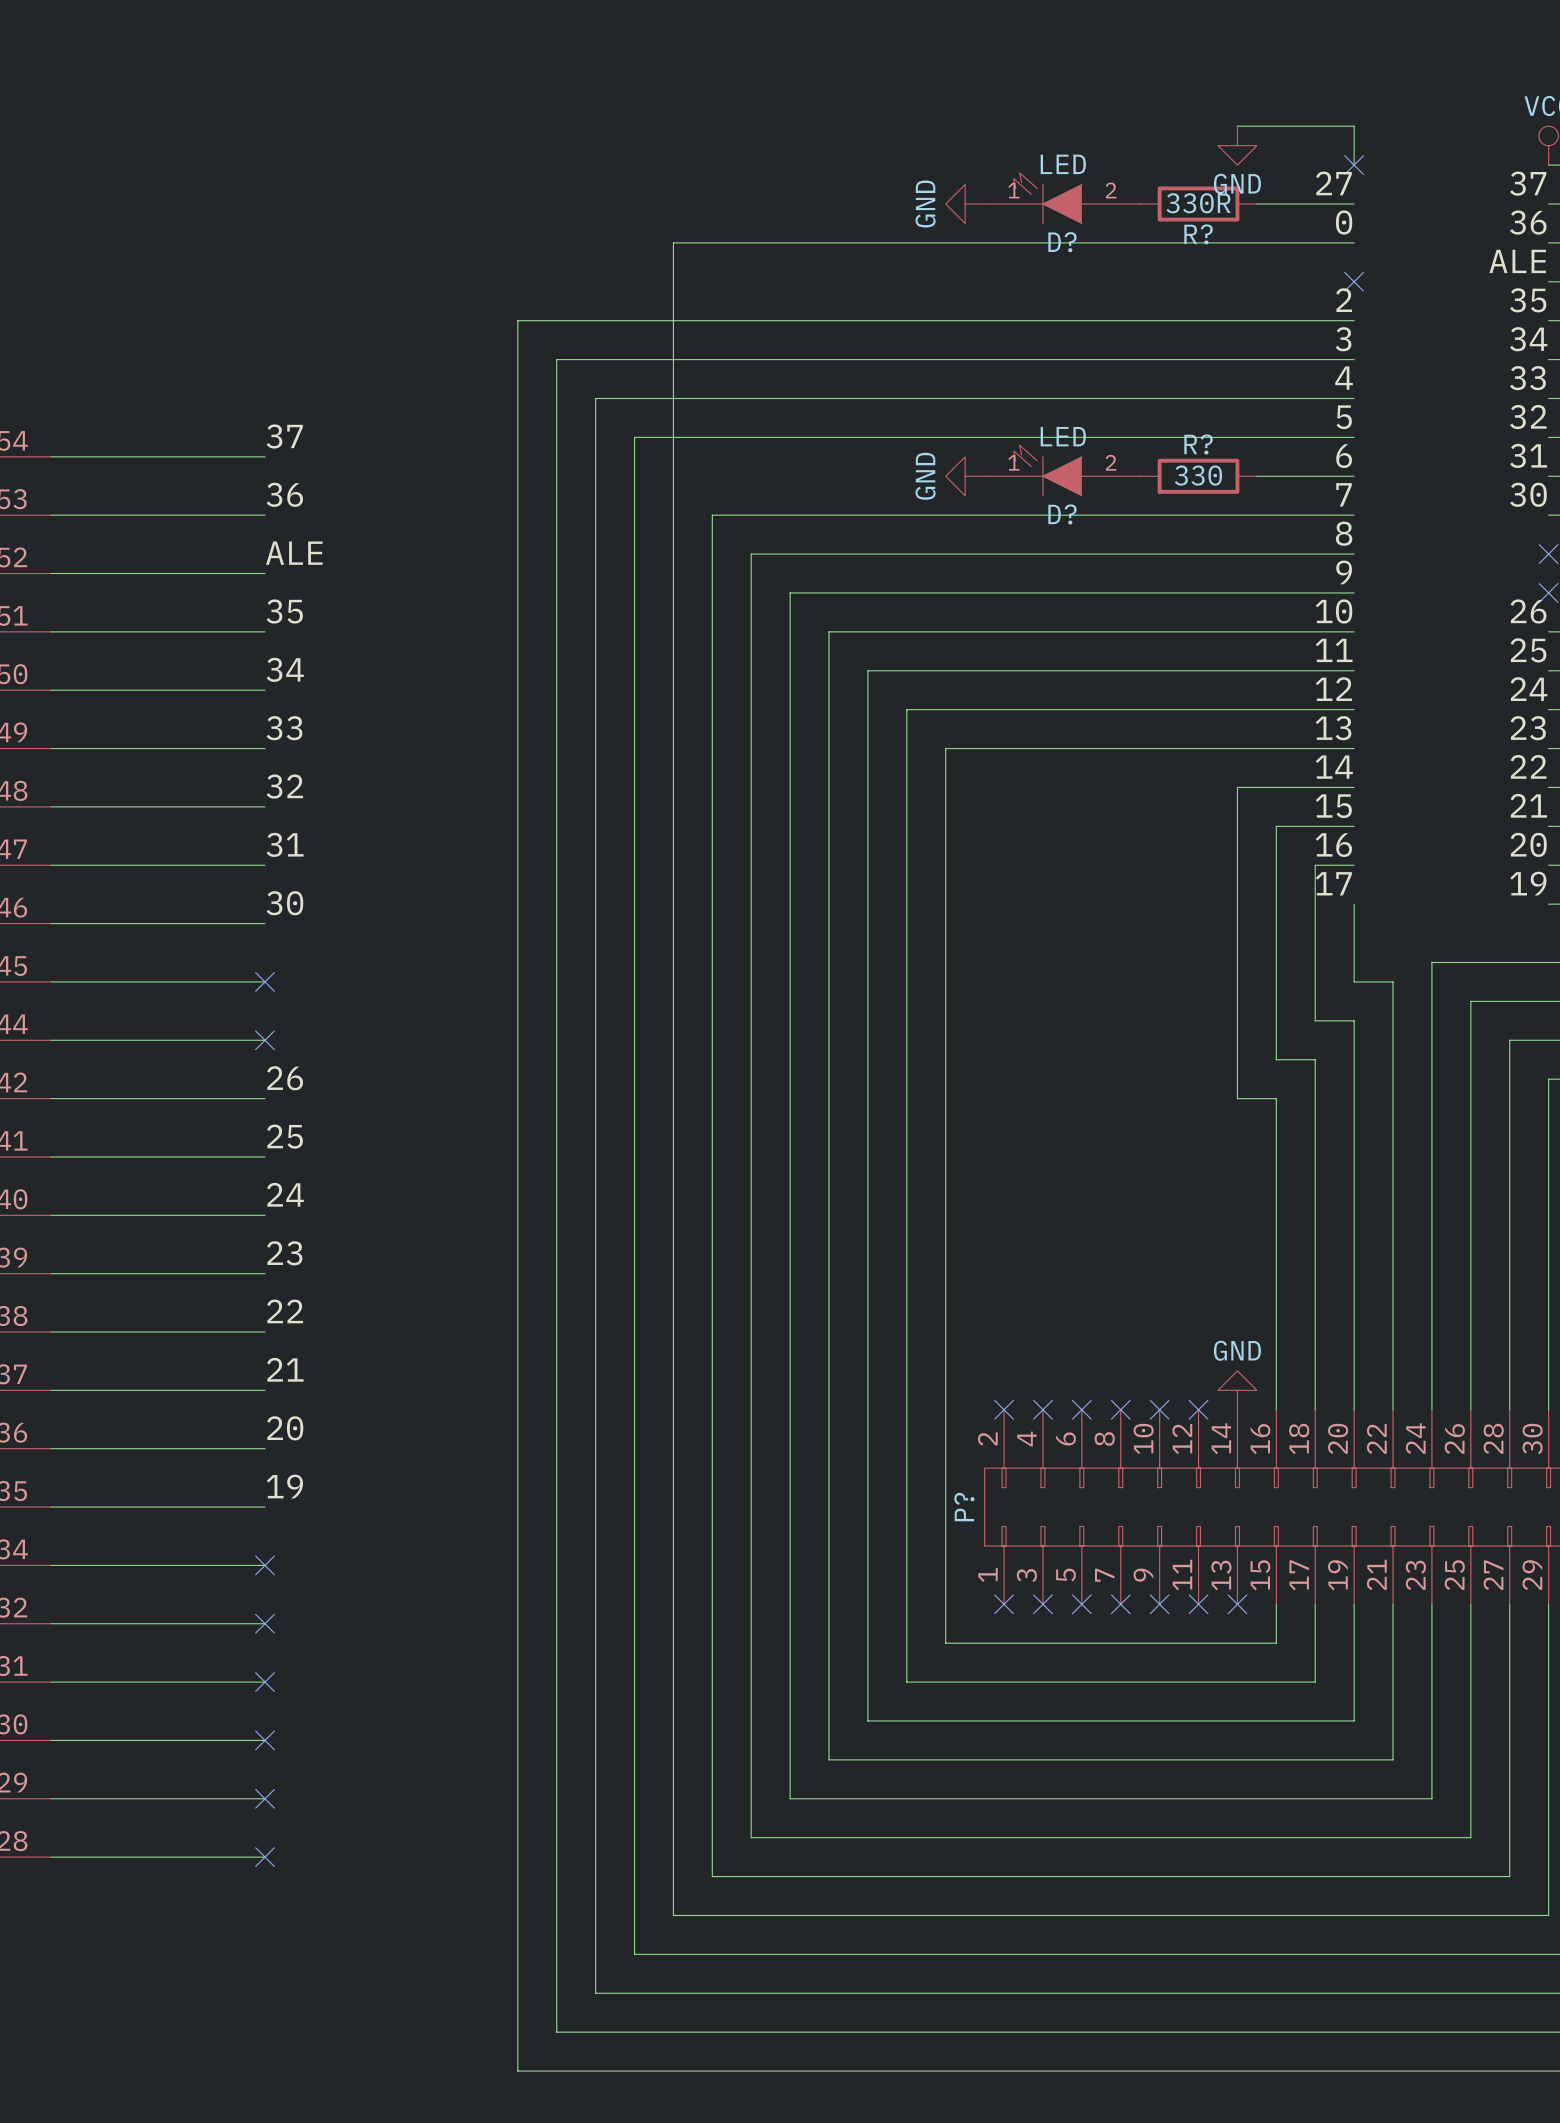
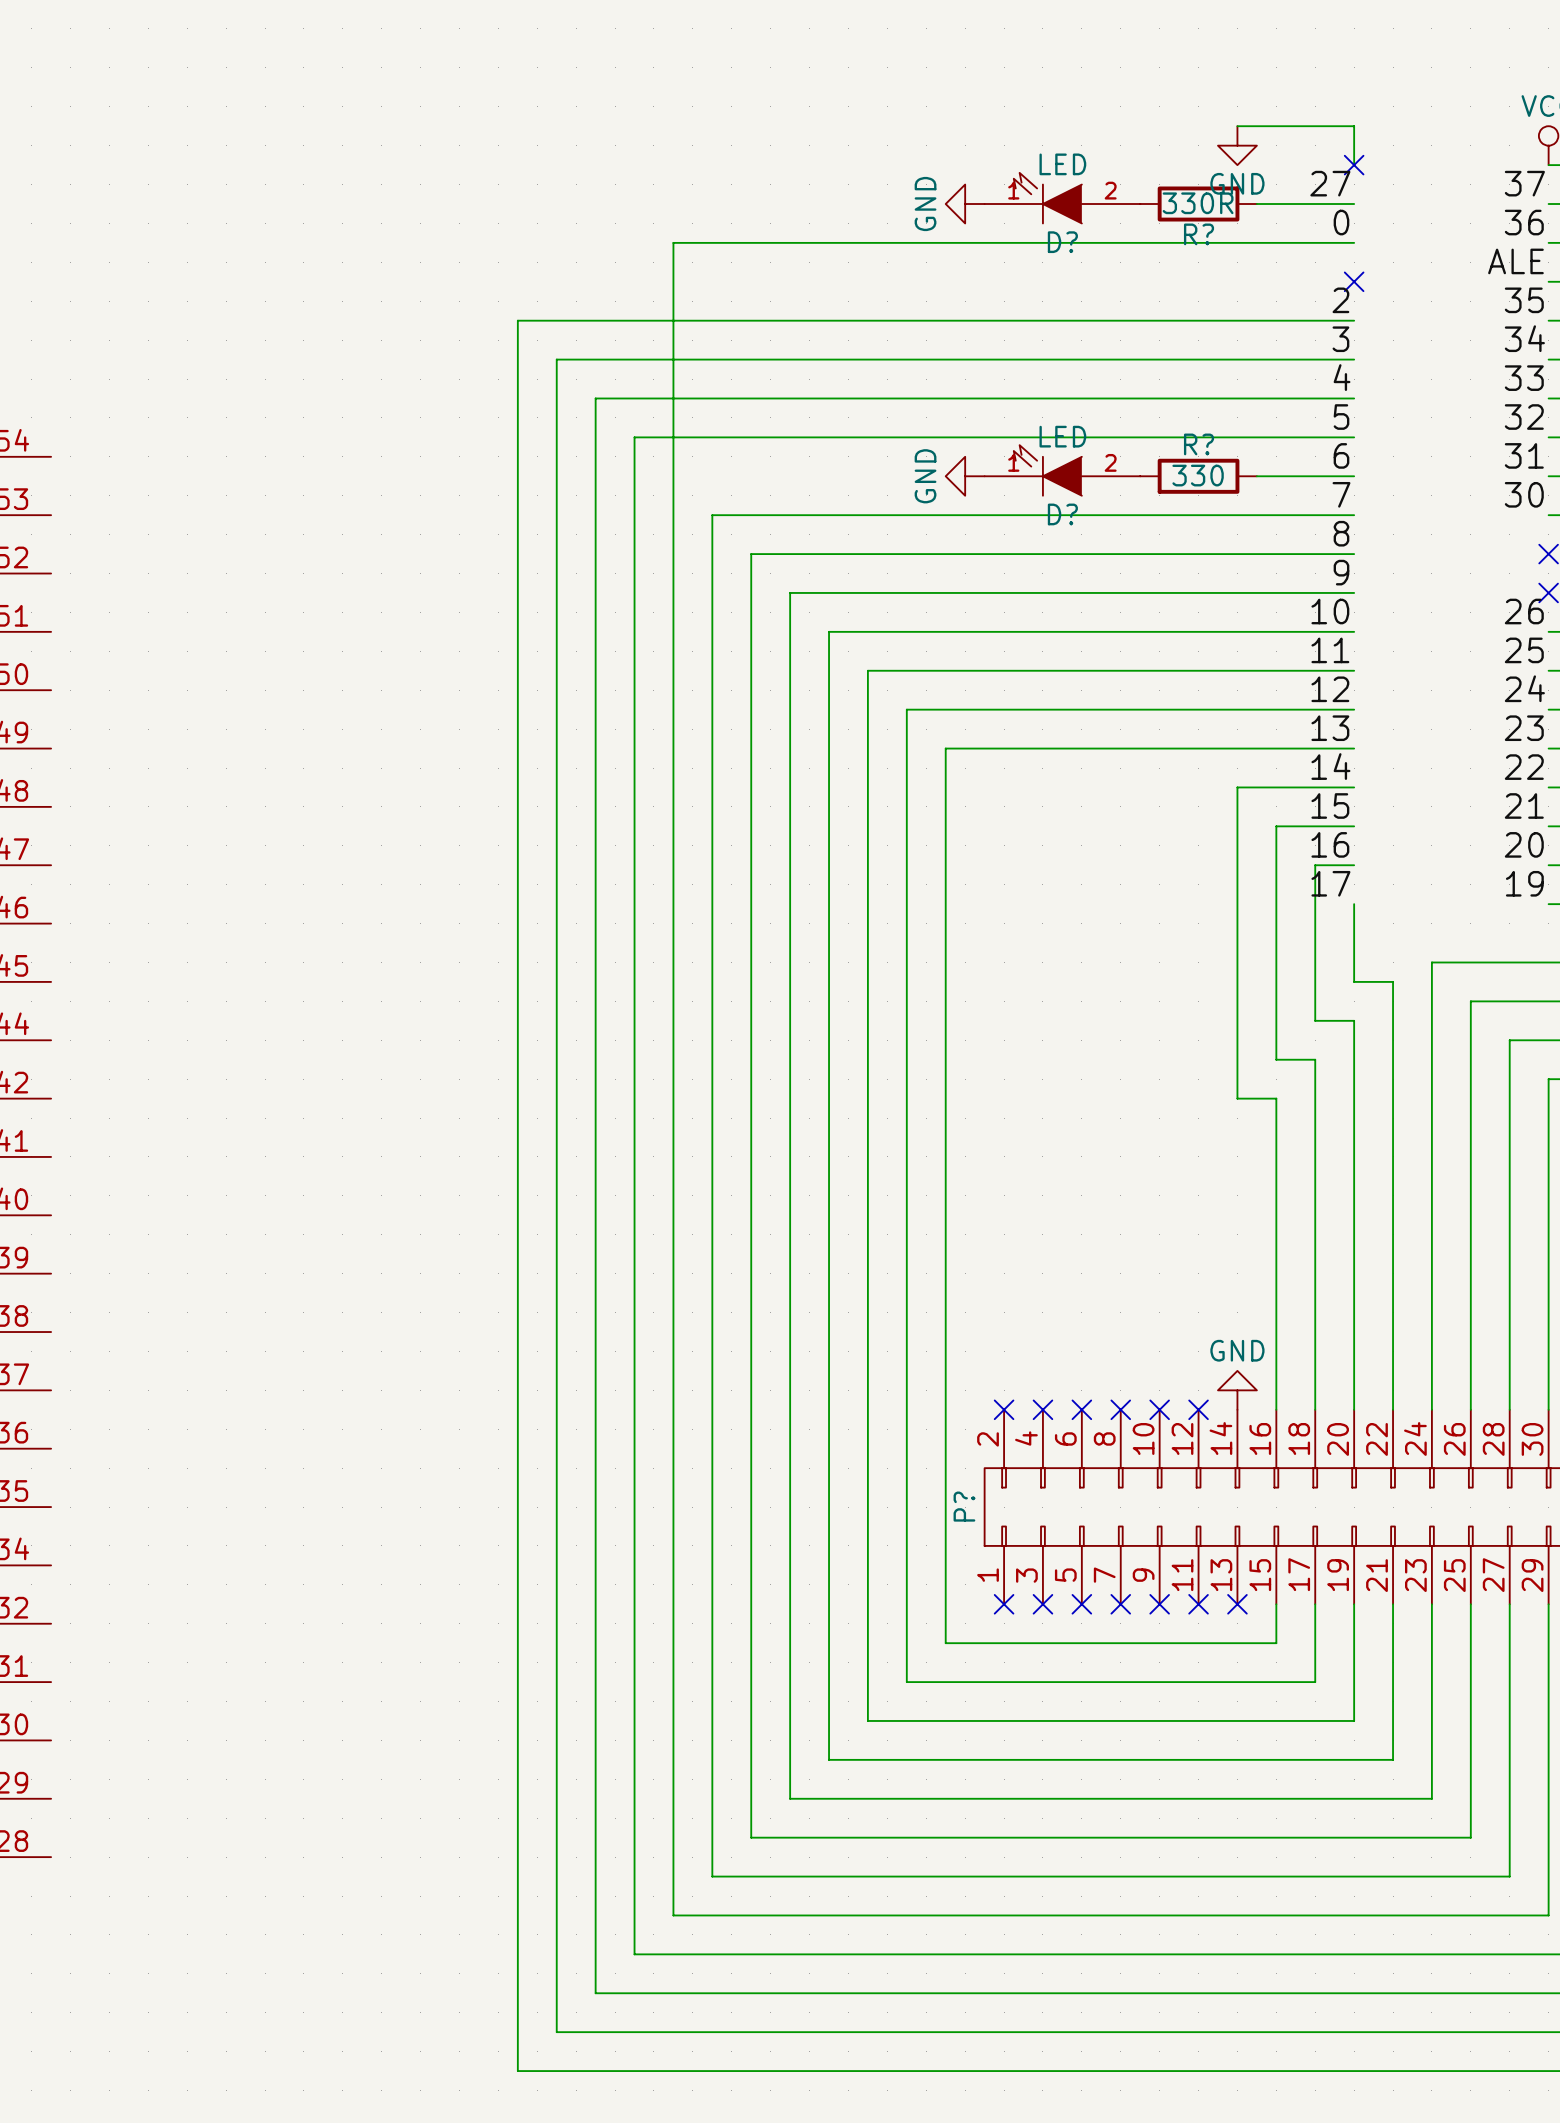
label: 37 (284, 436) -> none
wire: (51, 456) (265, 456) -> none
label: 36 (284, 494) -> none
wire: (51, 515) (265, 515) -> none
label: ALE (294, 553) -> none
wire: (51, 573) (265, 573) -> none
label: 35 (284, 611) -> none
wire: (51, 631) (265, 631) -> none
label: 34 (285, 669) -> none
wire: (51, 690) (265, 690) -> none
label: 33 (284, 728) -> none
wire: (51, 748) (265, 748) -> none
label: 32 (284, 786) -> none
wire: (51, 806) (265, 806) -> none
label: 31 (285, 844) -> none
wire: (51, 865) (265, 865) -> none
label: 30 (284, 903) -> none
wire: (51, 923) (265, 923) -> none
wire: (51, 981) (265, 981) -> none
no-connect mark: (265, 981) -> none
wire: (51, 1040) (265, 1040) -> none
no-connect mark: (265, 1040) -> none
label: 26 (285, 1078) -> none
wire: (51, 1098) (265, 1098) -> none
label: 25 (285, 1136) -> none
wire: (51, 1156) (265, 1156) -> none
label: 24 (285, 1194) -> none
wire: (51, 1215) (265, 1215) -> none
label: 23 (284, 1253) -> none
wire: (51, 1273) (265, 1273) -> none
label: 22 (285, 1311) -> none
wire: (51, 1332) (265, 1332) -> none
label: 21 (285, 1369) -> none
wire: (51, 1390) (265, 1390) -> none
label: 20 (285, 1428) -> none
wire: (51, 1448) (265, 1448) -> none
label: 19 (284, 1486) -> none
wire: (51, 1507) (265, 1507) -> none
wire: (51, 1565) (265, 1565) -> none
no-connect mark: (265, 1565) -> none
wire: (51, 1623) (265, 1623) -> none
no-connect mark: (265, 1623) -> none
wire: (51, 1682) (265, 1682) -> none
no-connect mark: (265, 1682) -> none
wire: (51, 1740) (265, 1740) -> none
no-connect mark: (265, 1740) -> none
wire: (51, 1798) (265, 1798) -> none
no-connect mark: (265, 1798) -> none
wire: (51, 1857) (265, 1857) -> none
no-connect mark: (265, 1857) -> none

